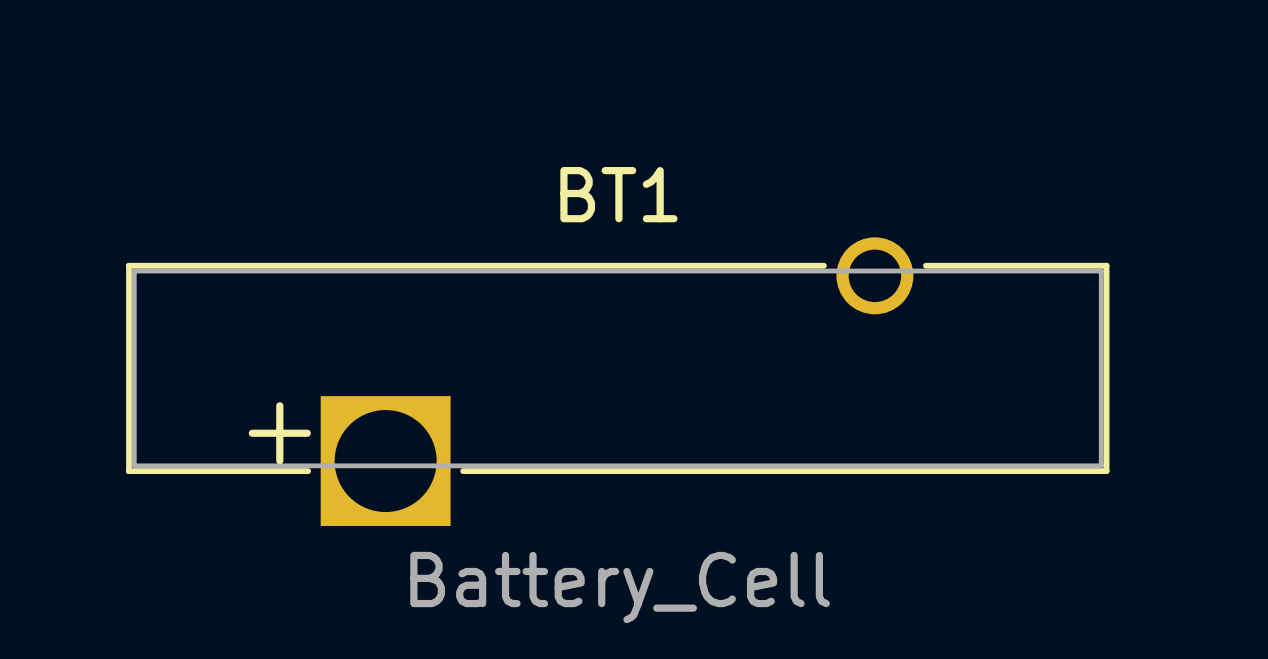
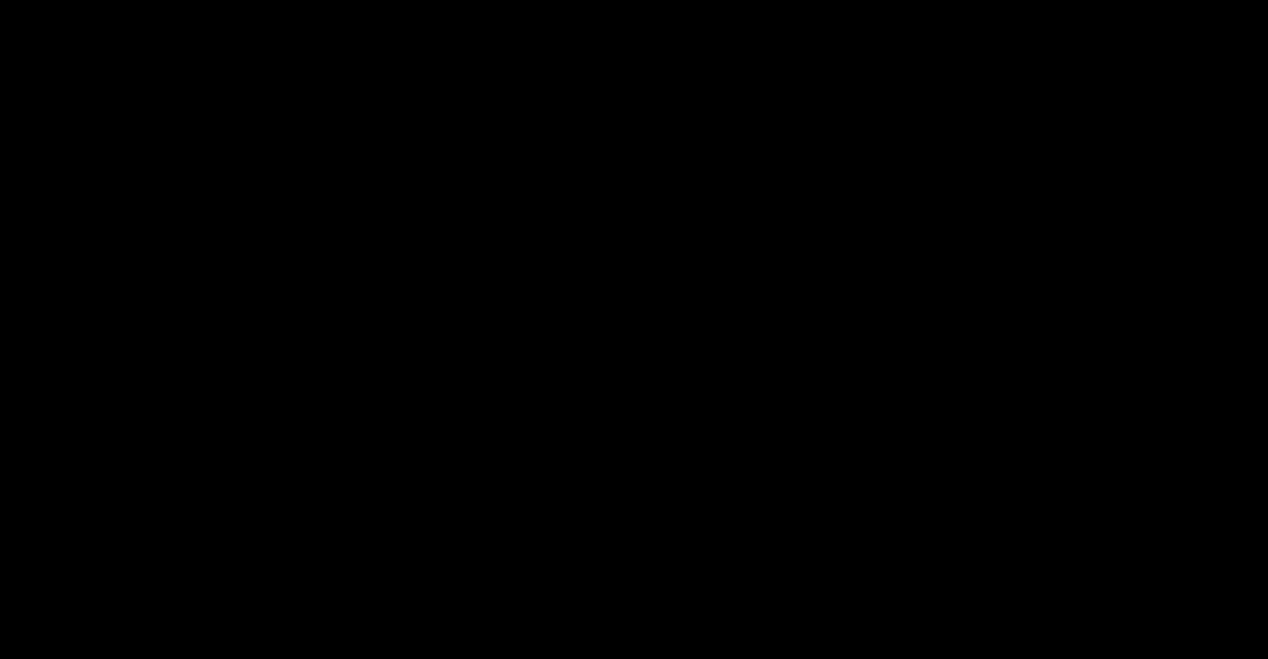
BT1: Battery_Cell (617, 381) -> none

